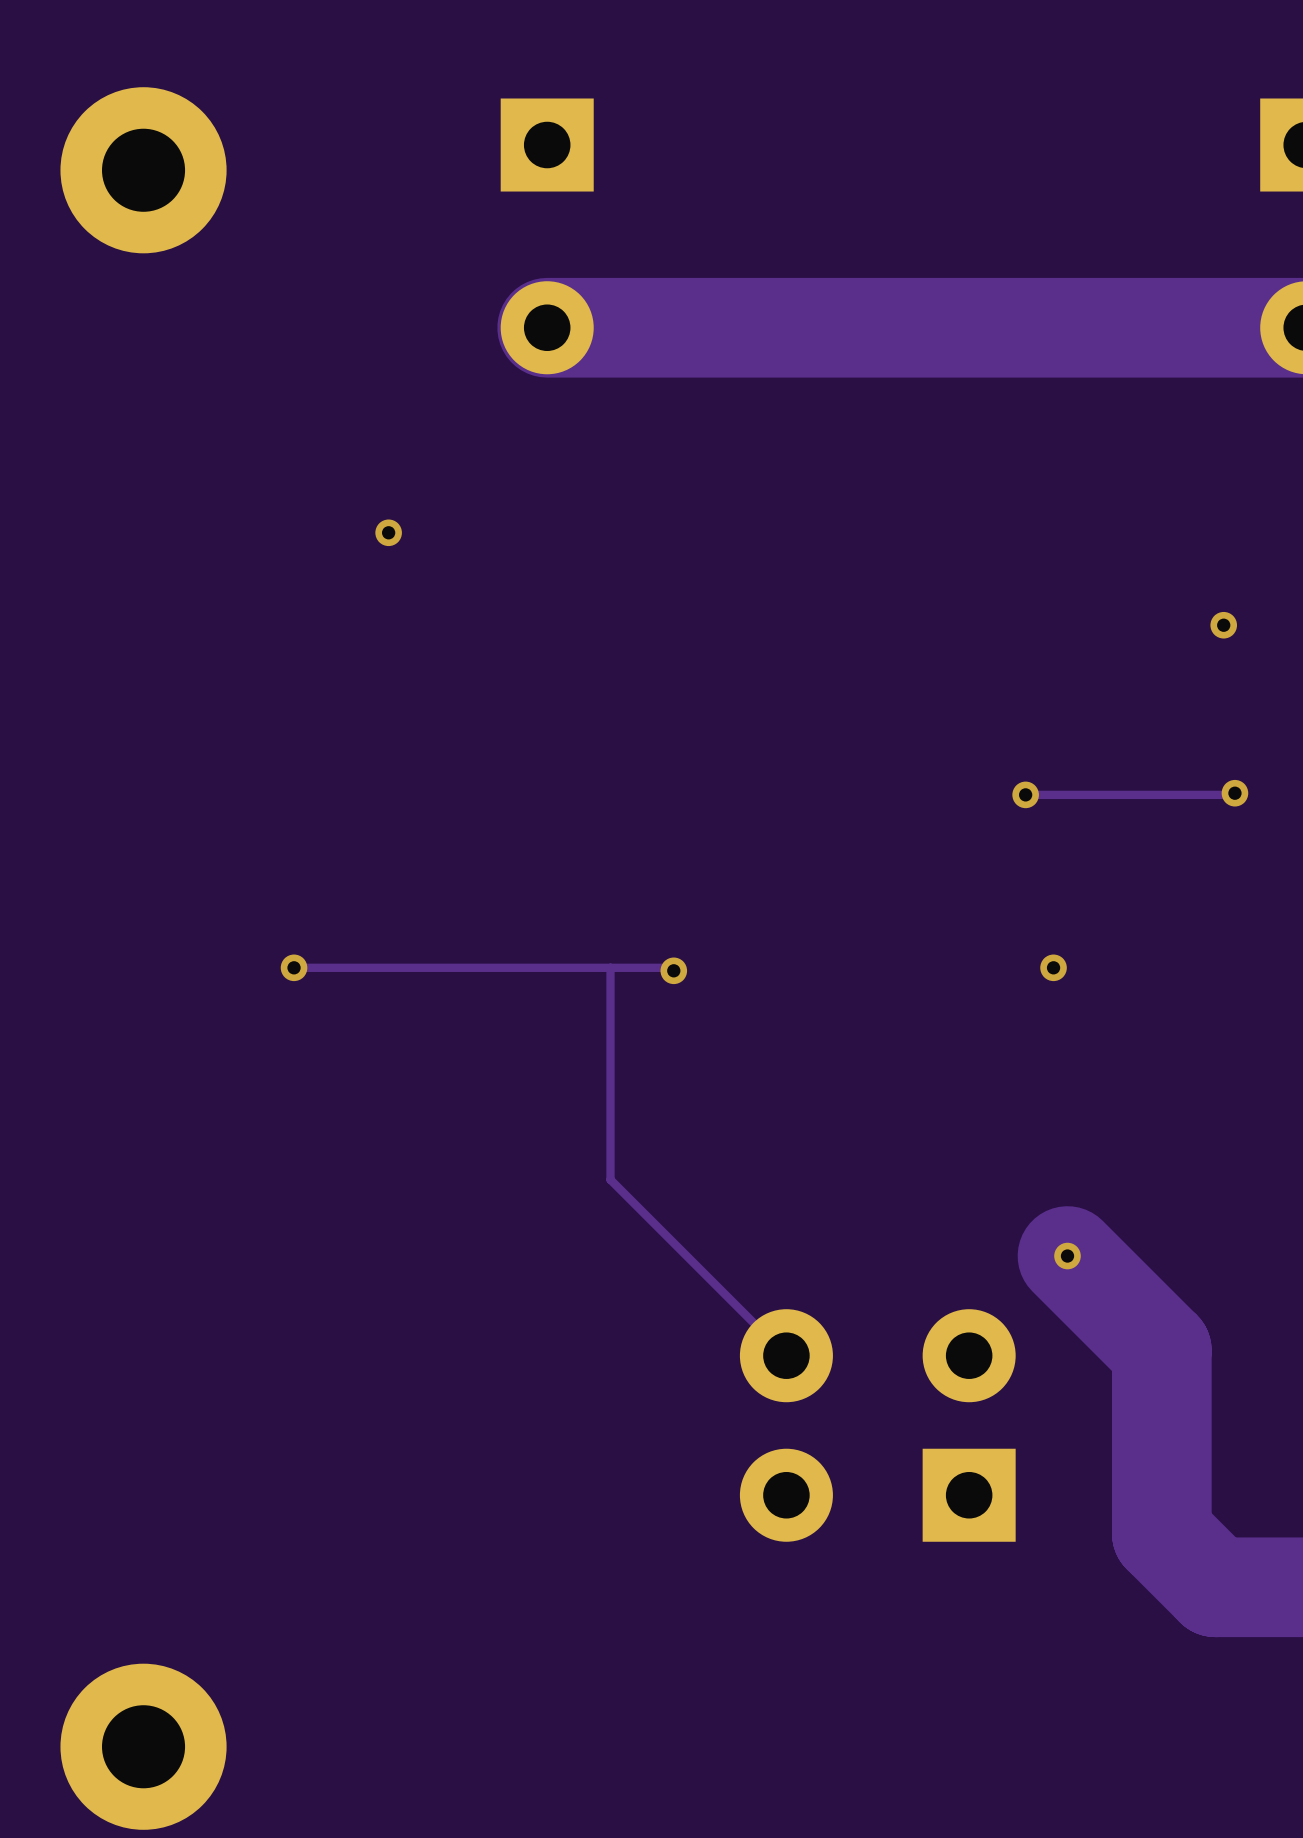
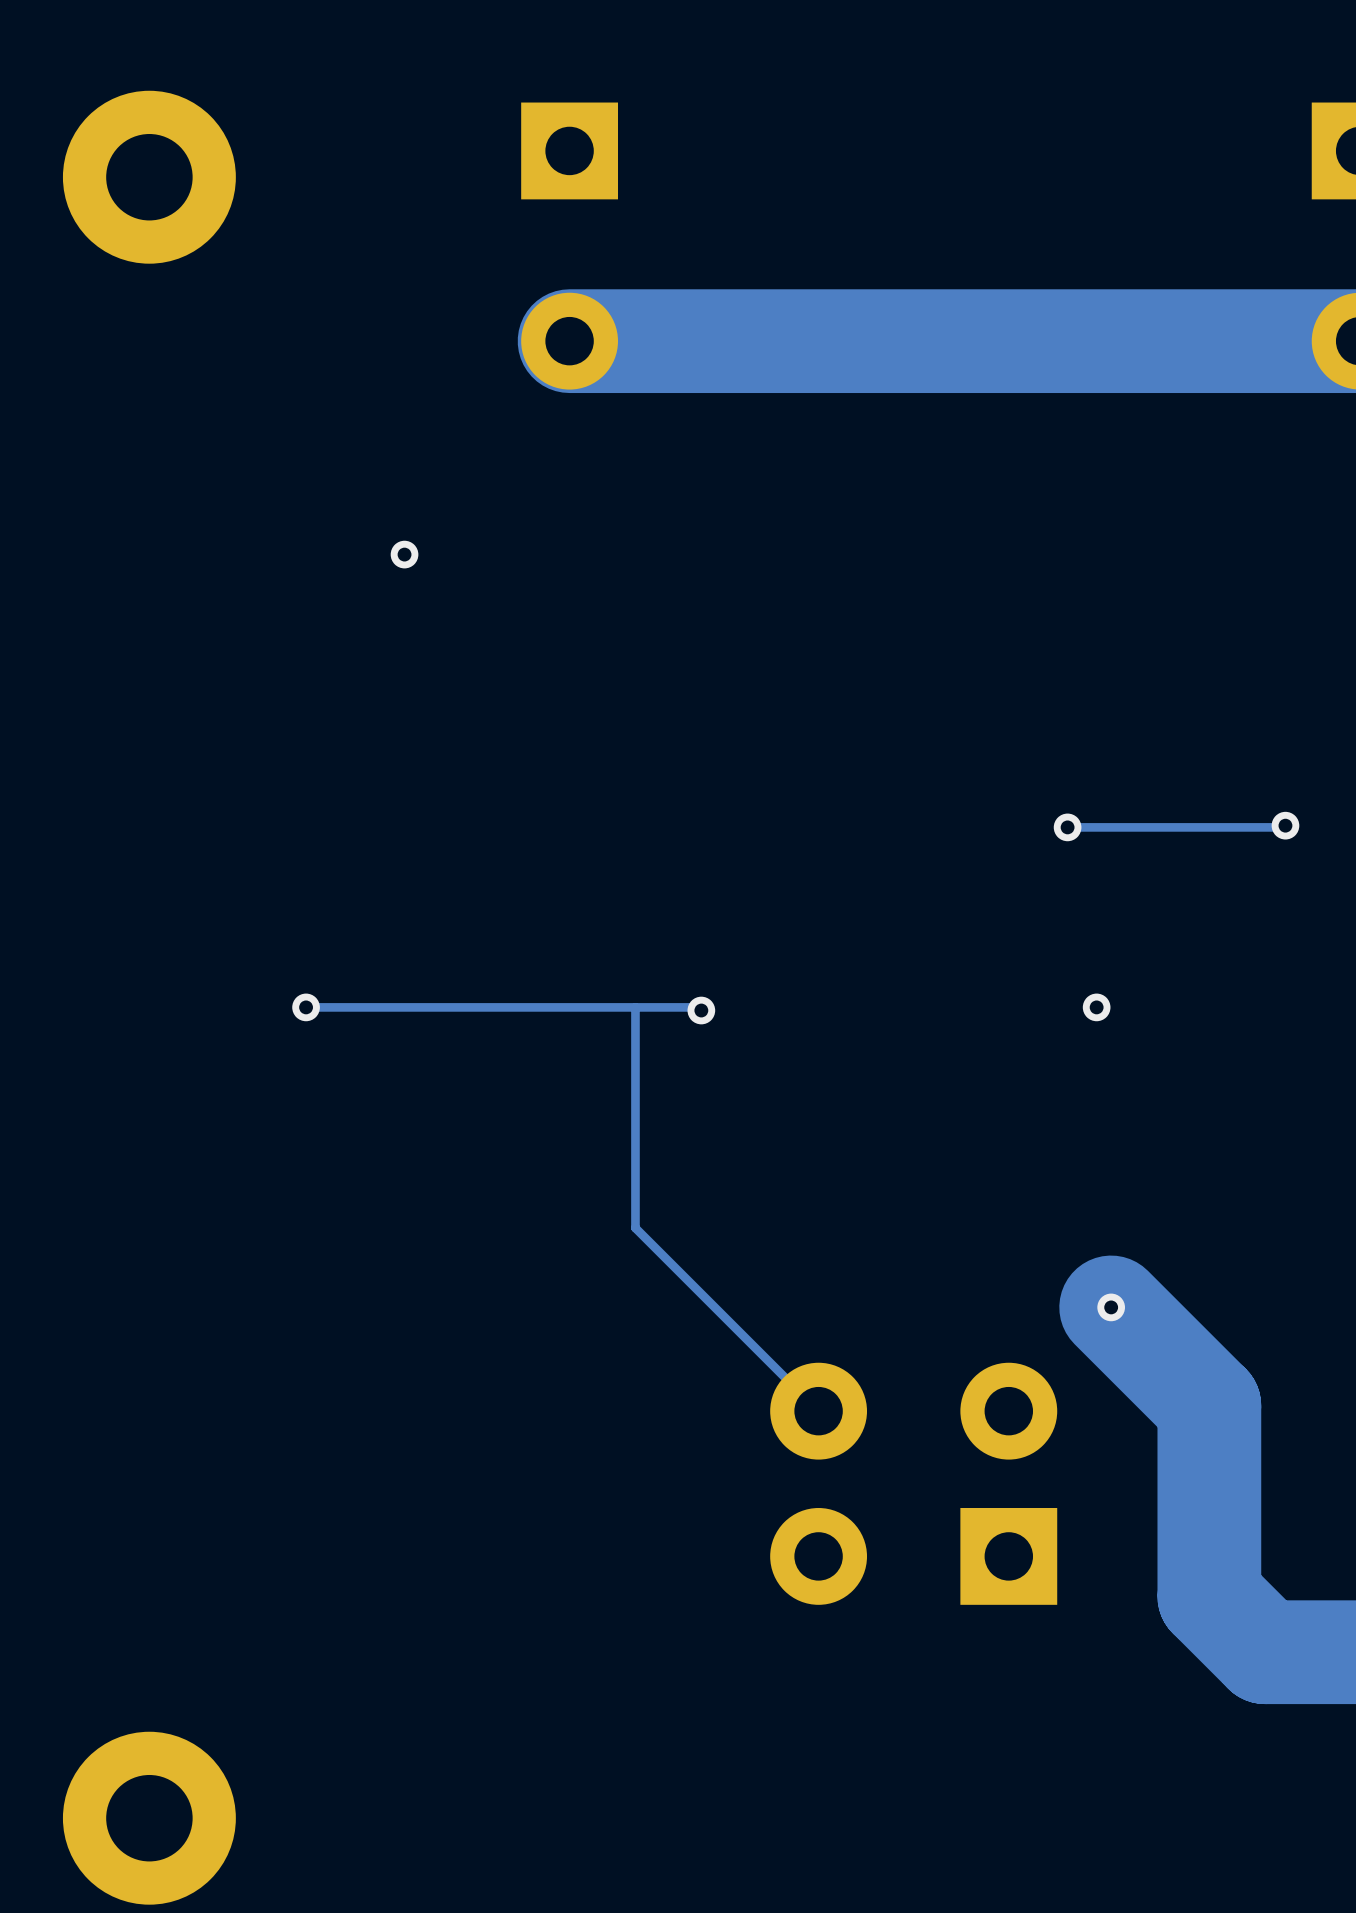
via: (1223, 625) -> none

